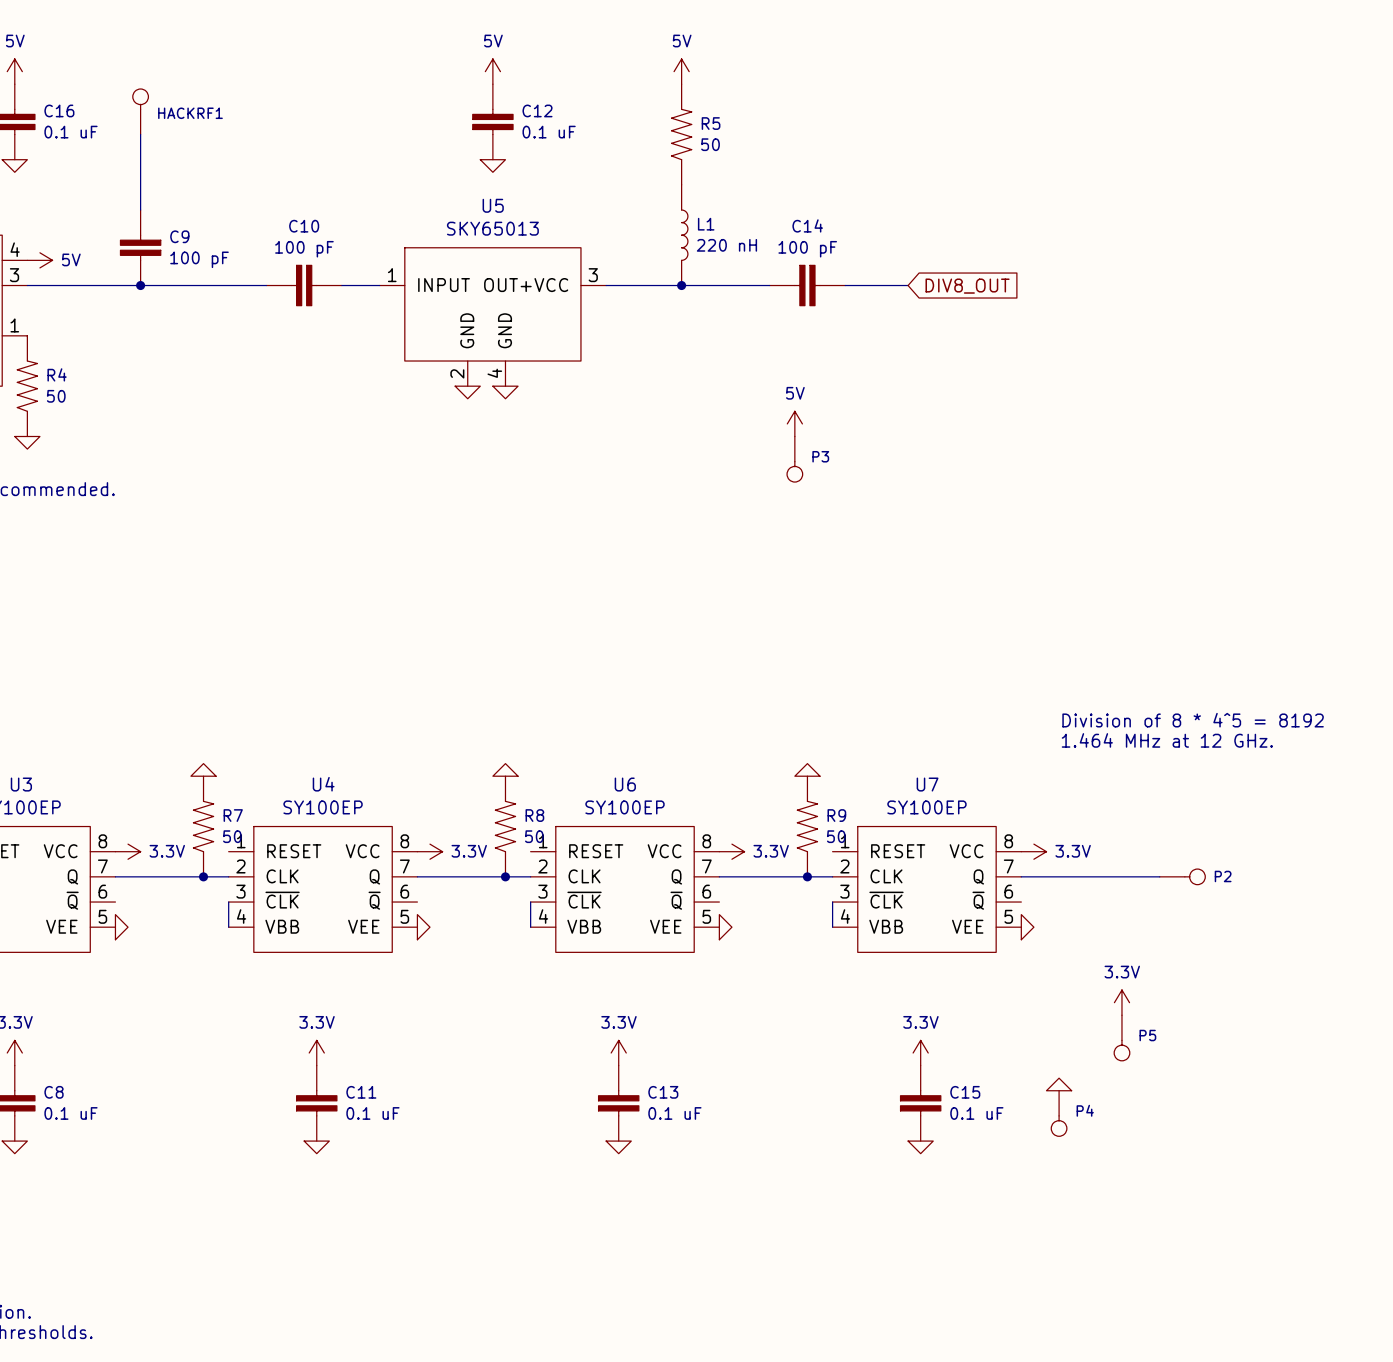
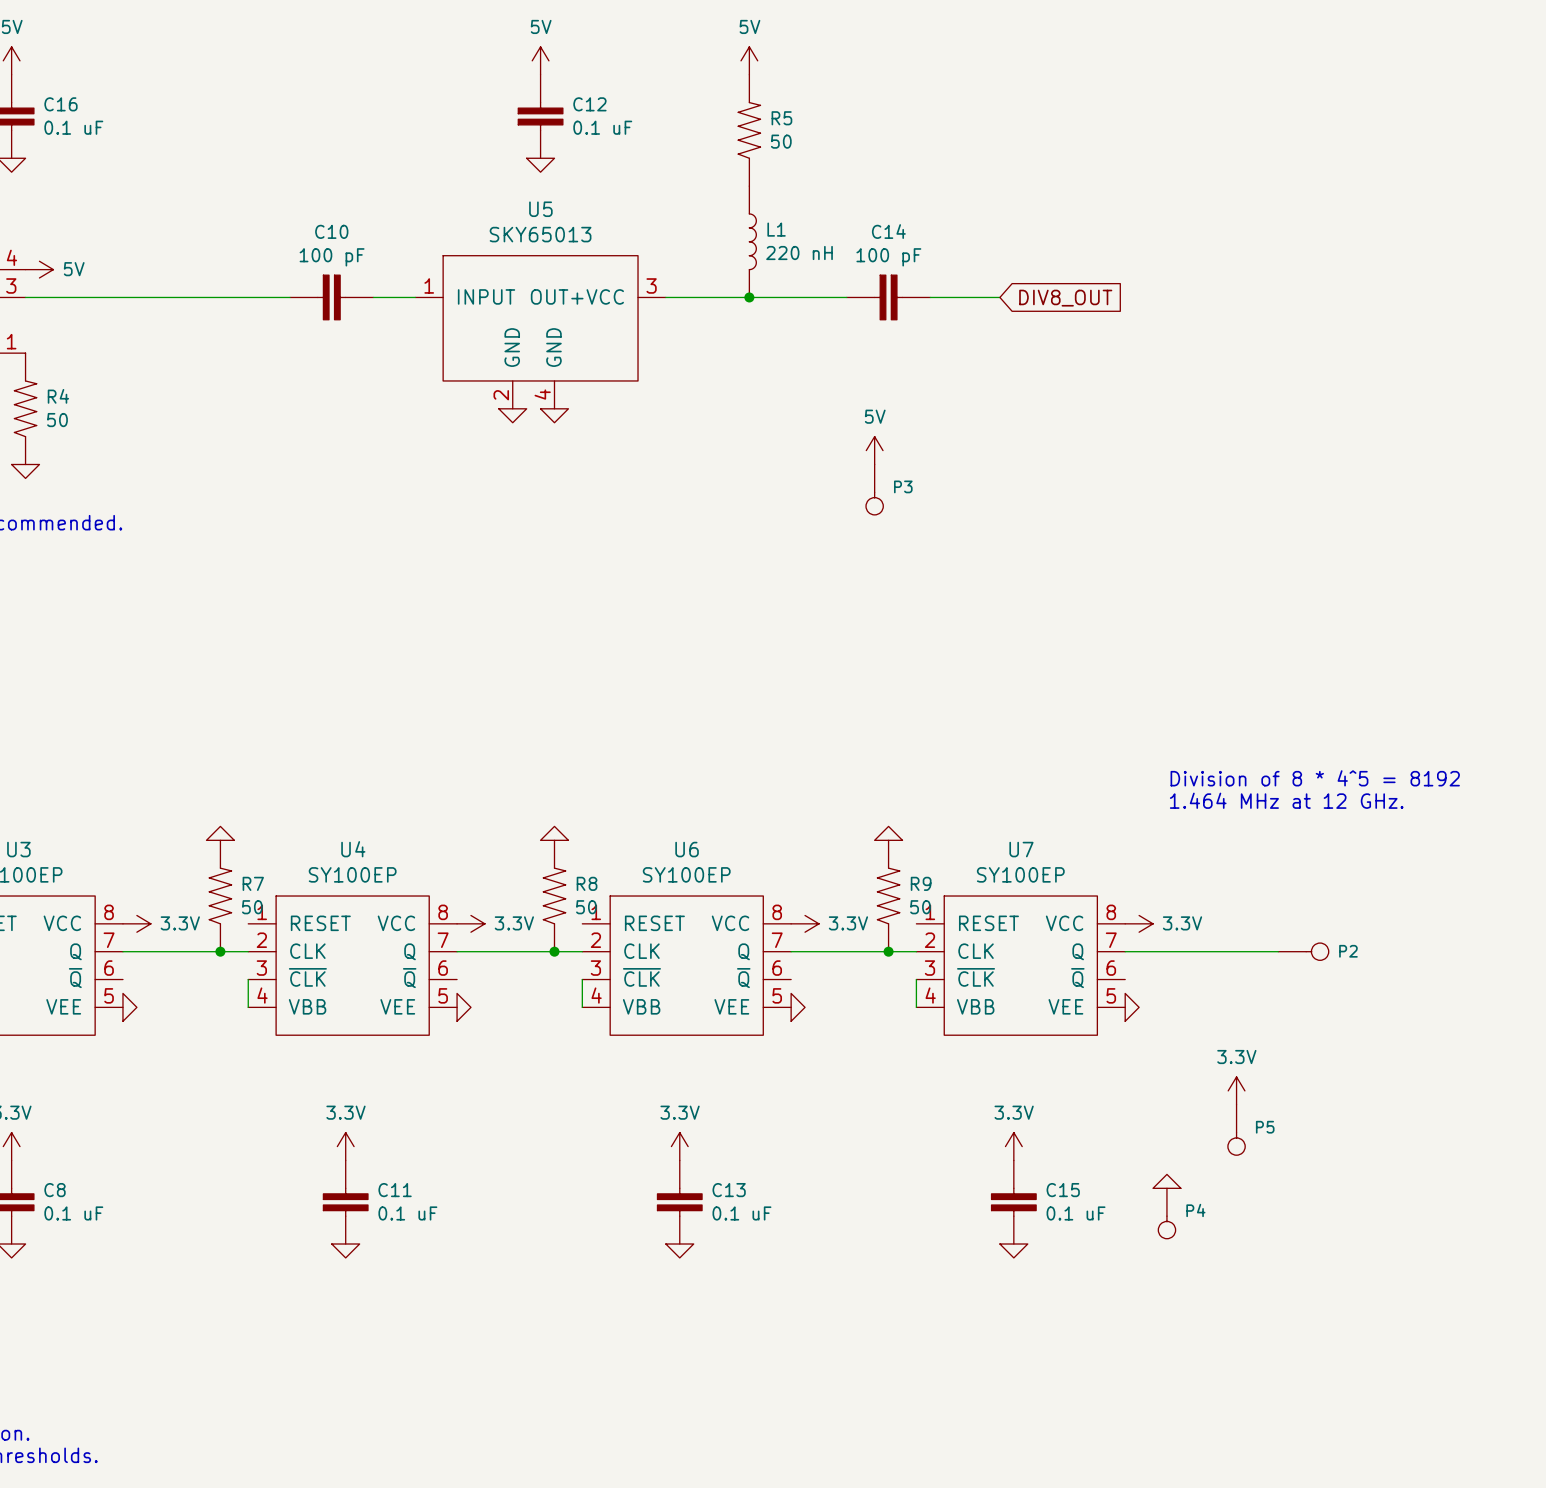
HACKRF1: (140, 111) -> none
wire: (140, 134) (140, 210) -> none
C9: 100 pF (140, 247) -> none
junction: (140, 285) -> none

